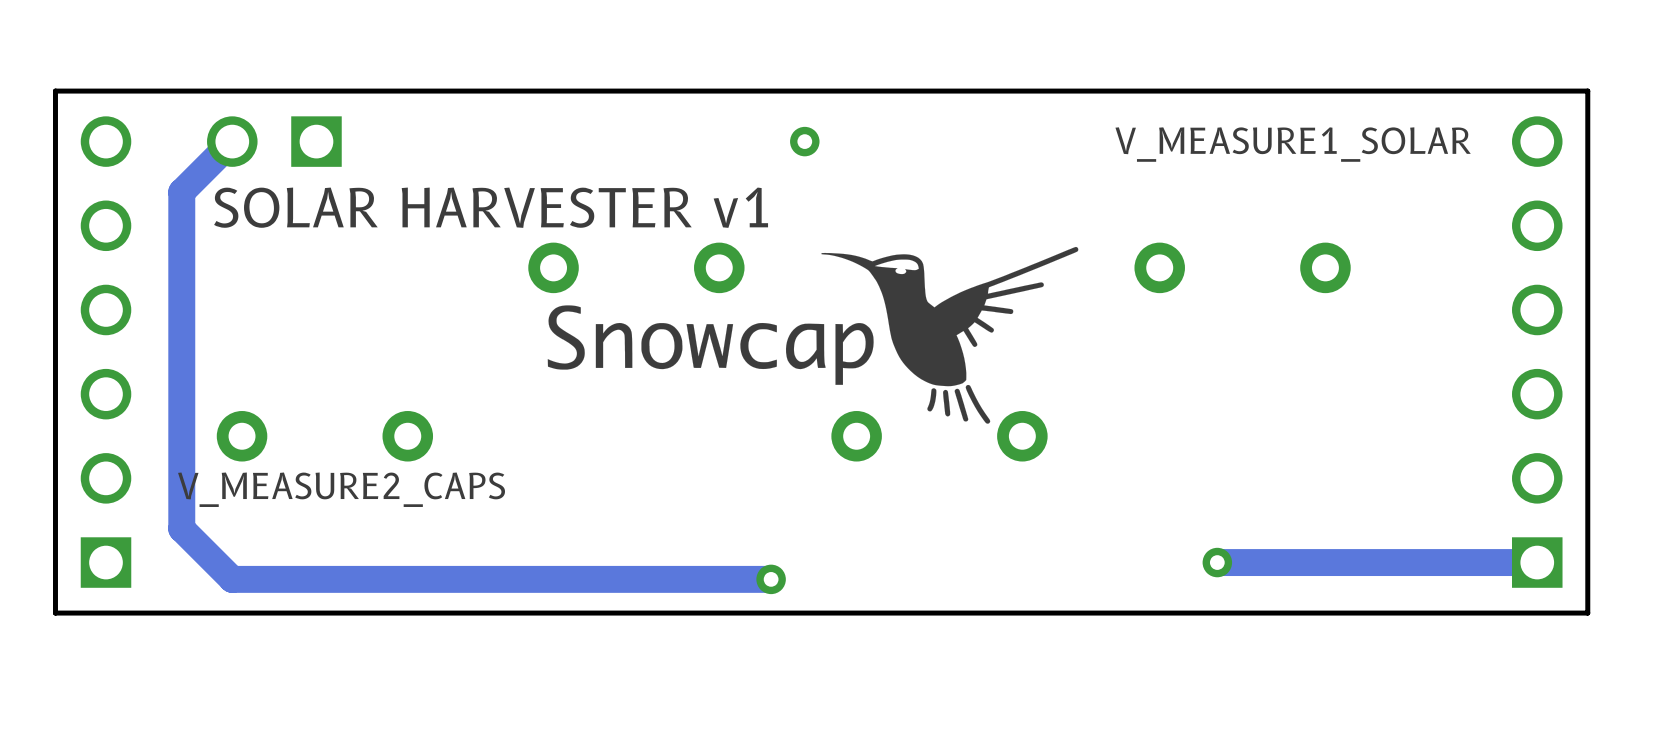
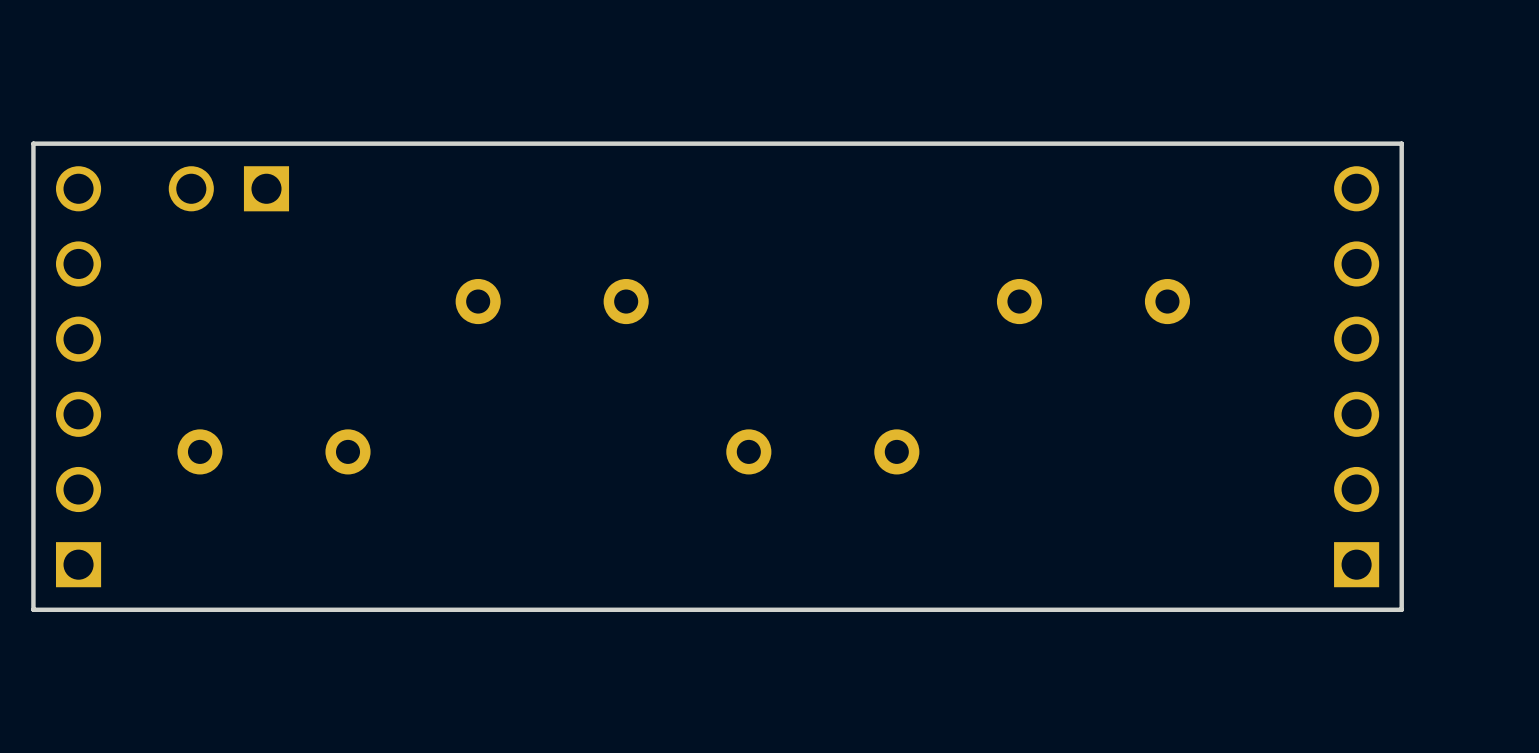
track: (232, 141) (181, 192) (181, 528) (232, 579) (771, 579) -> none
via: (804, 141) -> none
text: V_MEASURE1_SOLAR (1293, 144) -> none
text: SOLAR HARVESTER v1 (491, 207) -> none
drawing: [547, 246, 1079, 424] -> none
text: V_MEASURE2_CAPS (341, 489) -> none
via: (1217, 562) -> none
track: (1537, 562) (1217, 562) -> none
via: (771, 579) -> none

